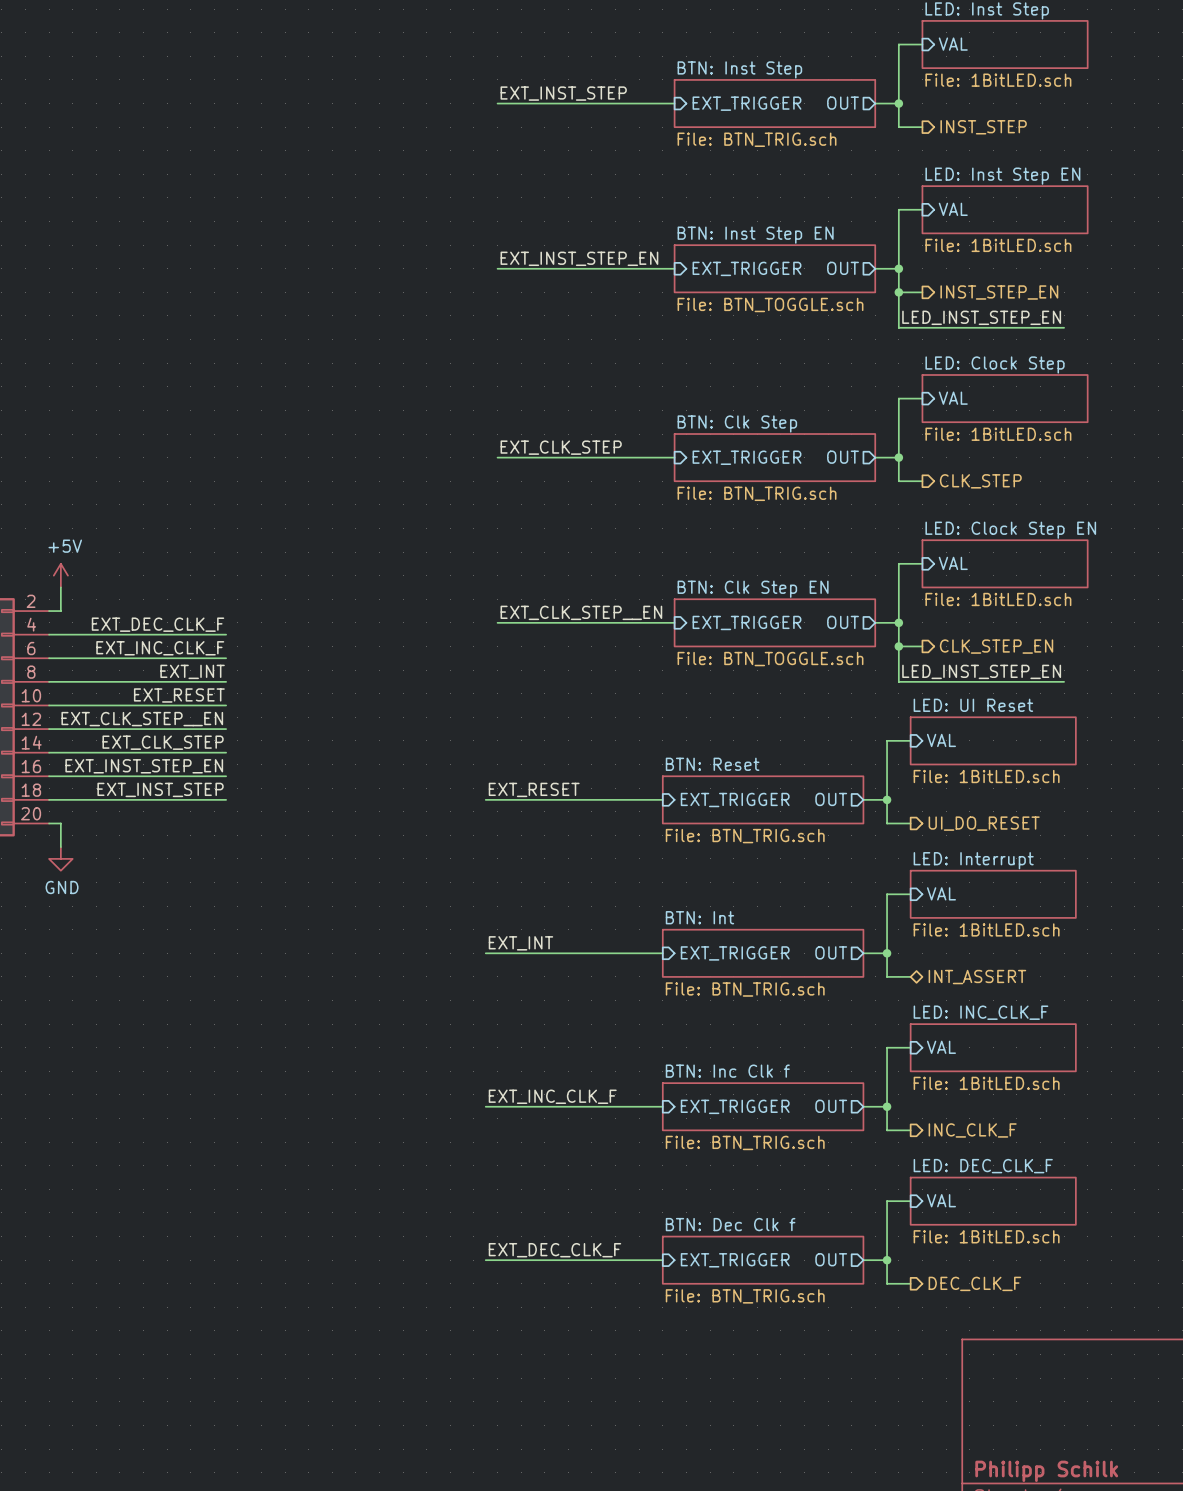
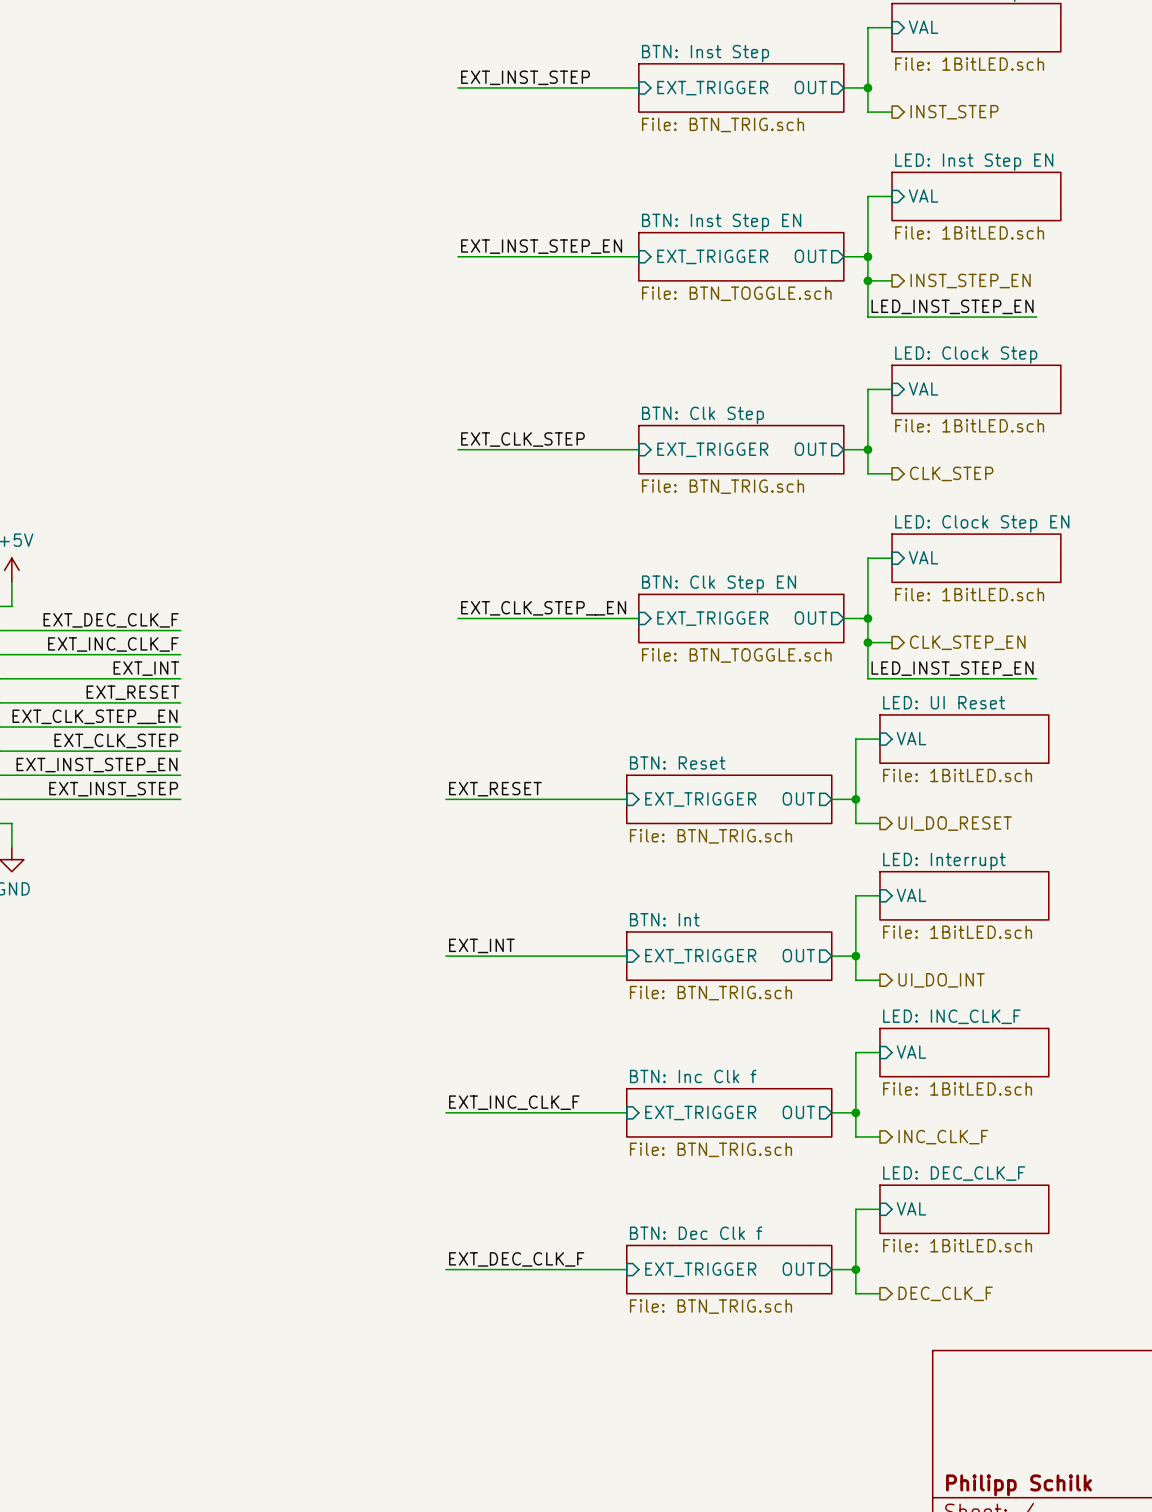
hierarchical label shape: bidirectional (977, 977) -> output (941, 980)
hierarchical label: INT_ASSERT (977, 977) -> UI_DO_INT (941, 980)

